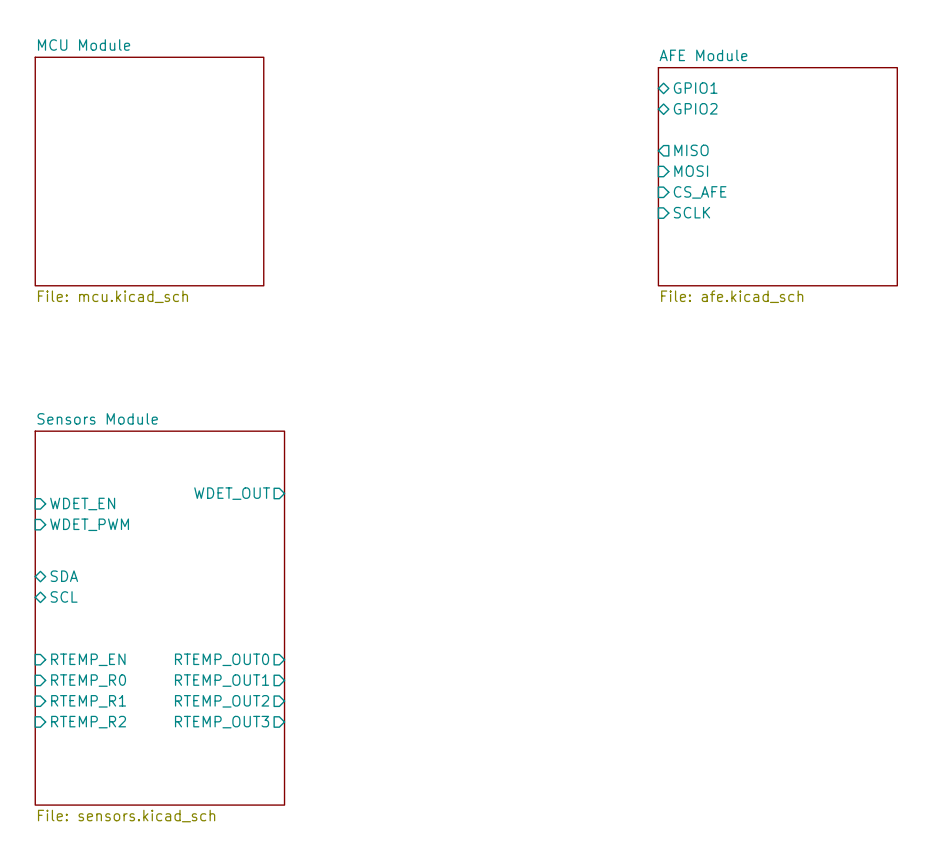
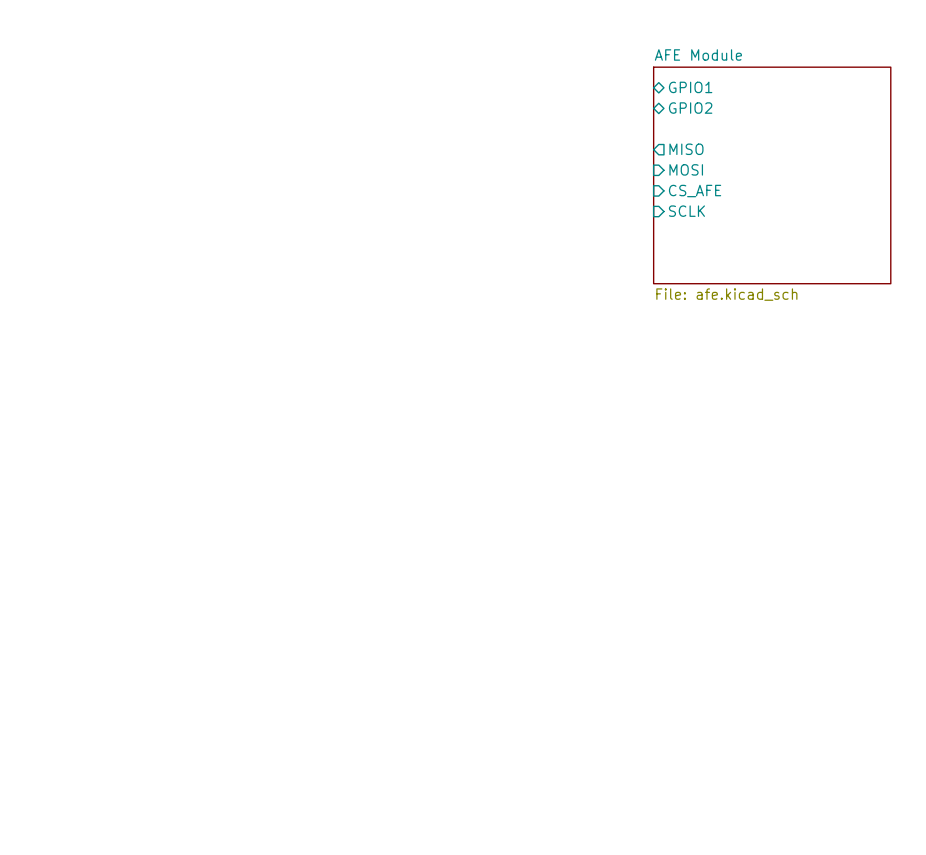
sheet MCU Module: File: mcu.kicad_sch (149, 171) -> none
sheet pin: WDET_OUT (232, 493) -> none
sheet pin: WDET_EN (82, 503) -> none
sheet pin: WDET_PWM (89, 524) -> none
sheet pin: SDA (64, 576) -> none
sheet pin: SCL (64, 596) -> none
sheet Sensors Module: File: sensors.kicad_sch (159, 618) -> none
sheet pin: RTEMP_EN (88, 659) -> none
sheet pin: RTEMP_OUT0 (222, 659) -> none
sheet pin: RTEMP_R0 (88, 680) -> none
sheet pin: RTEMP_OUT1 (222, 680) -> none
sheet pin: RTEMP_R1 (88, 701) -> none
sheet pin: RTEMP_OUT2 (222, 701) -> none
sheet pin: RTEMP_R2 (88, 722) -> none
sheet pin: RTEMP_OUT3 (222, 722) -> none

